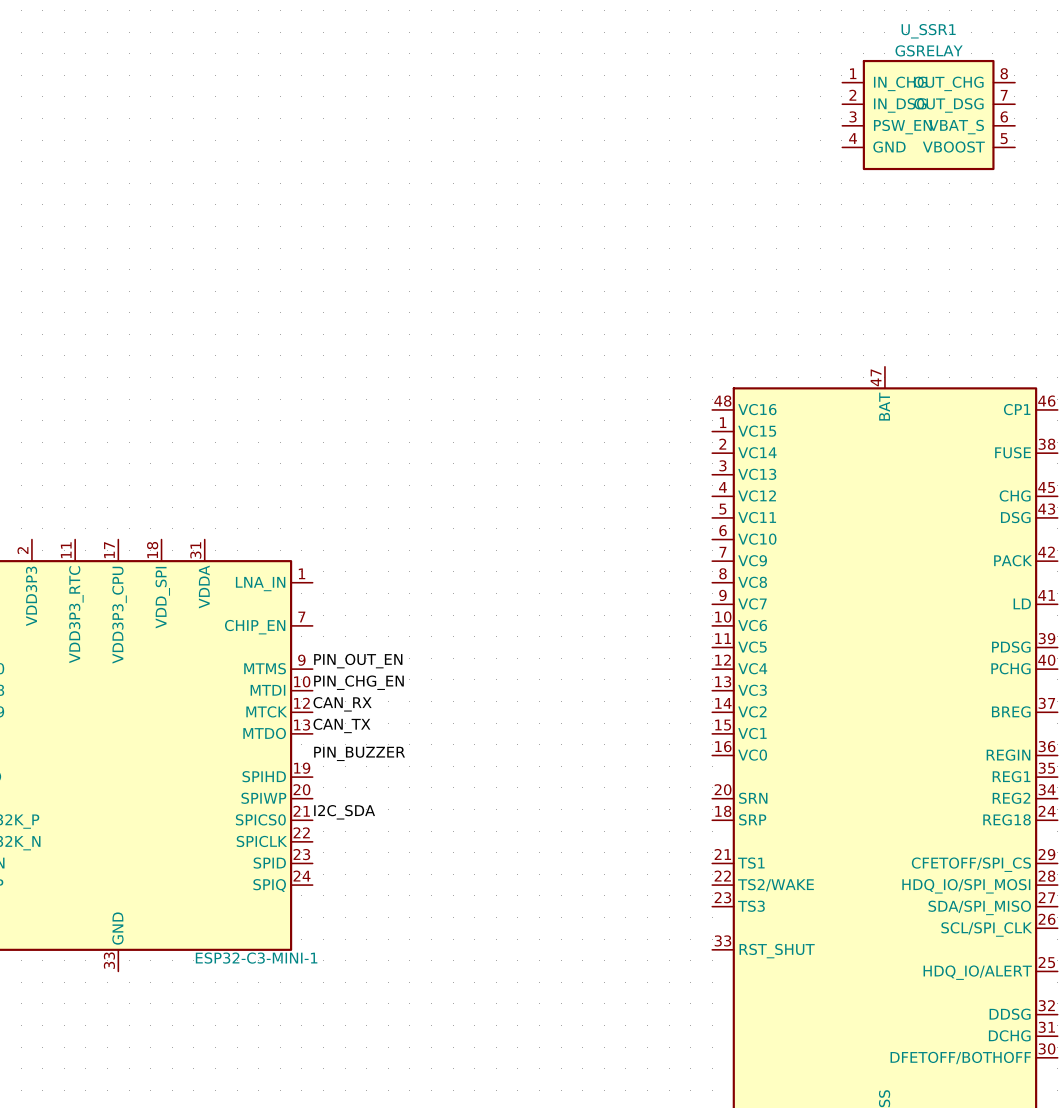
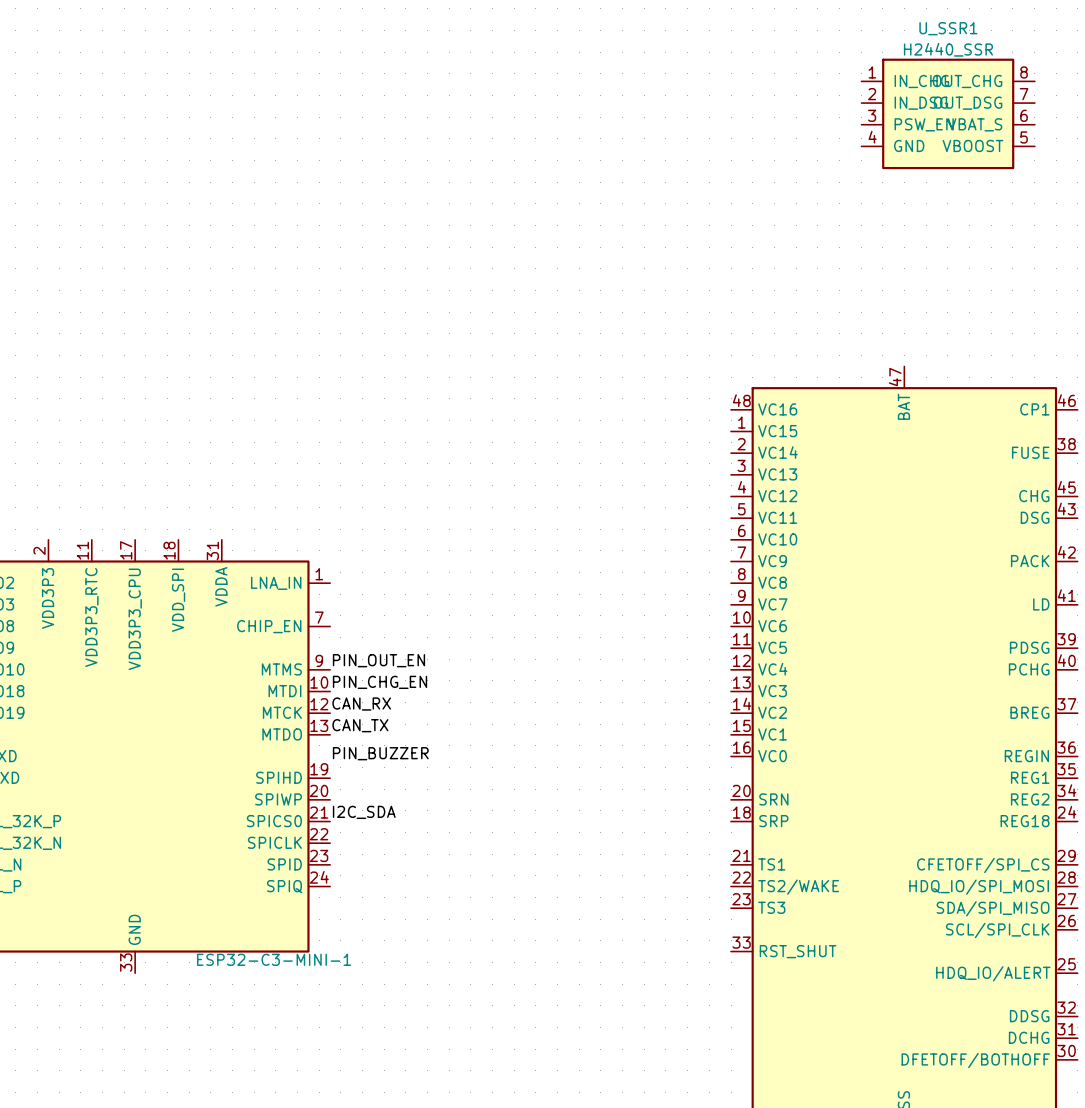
U_SSR1 value: GSRELAY (929, 50) -> H2440_SSR (948, 49)

